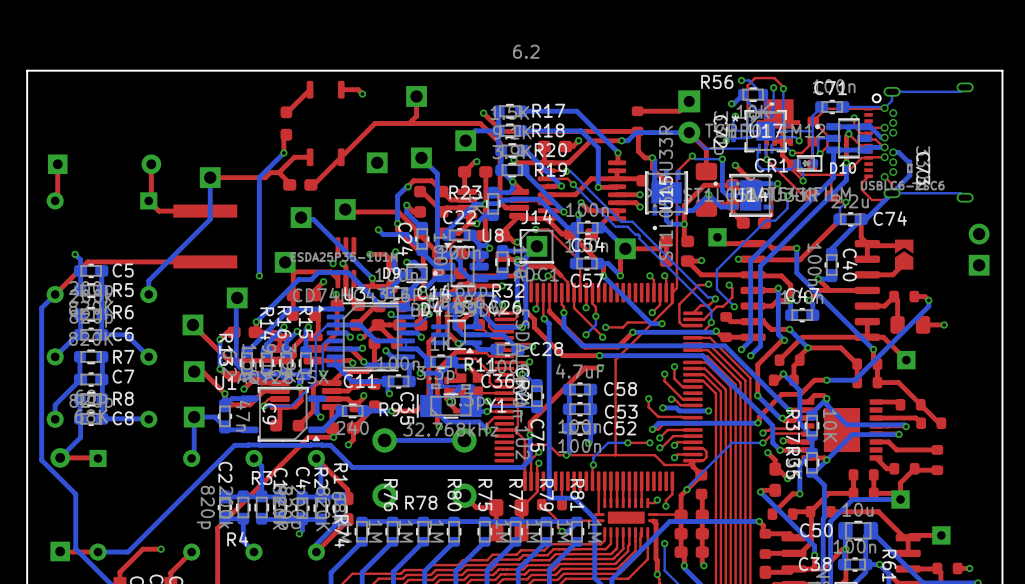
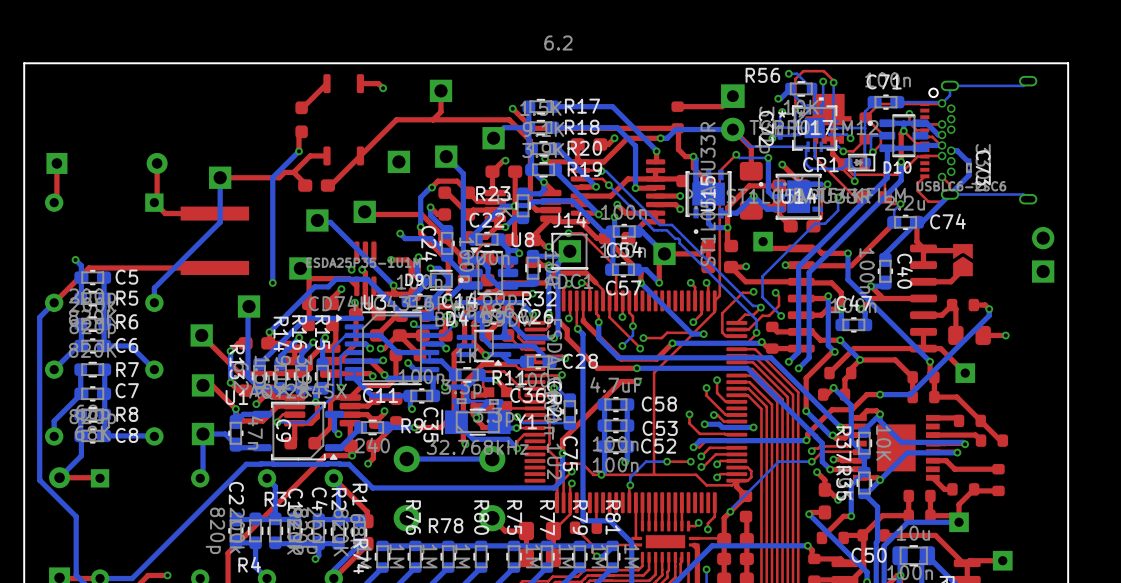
via: (767, 159) -> none

